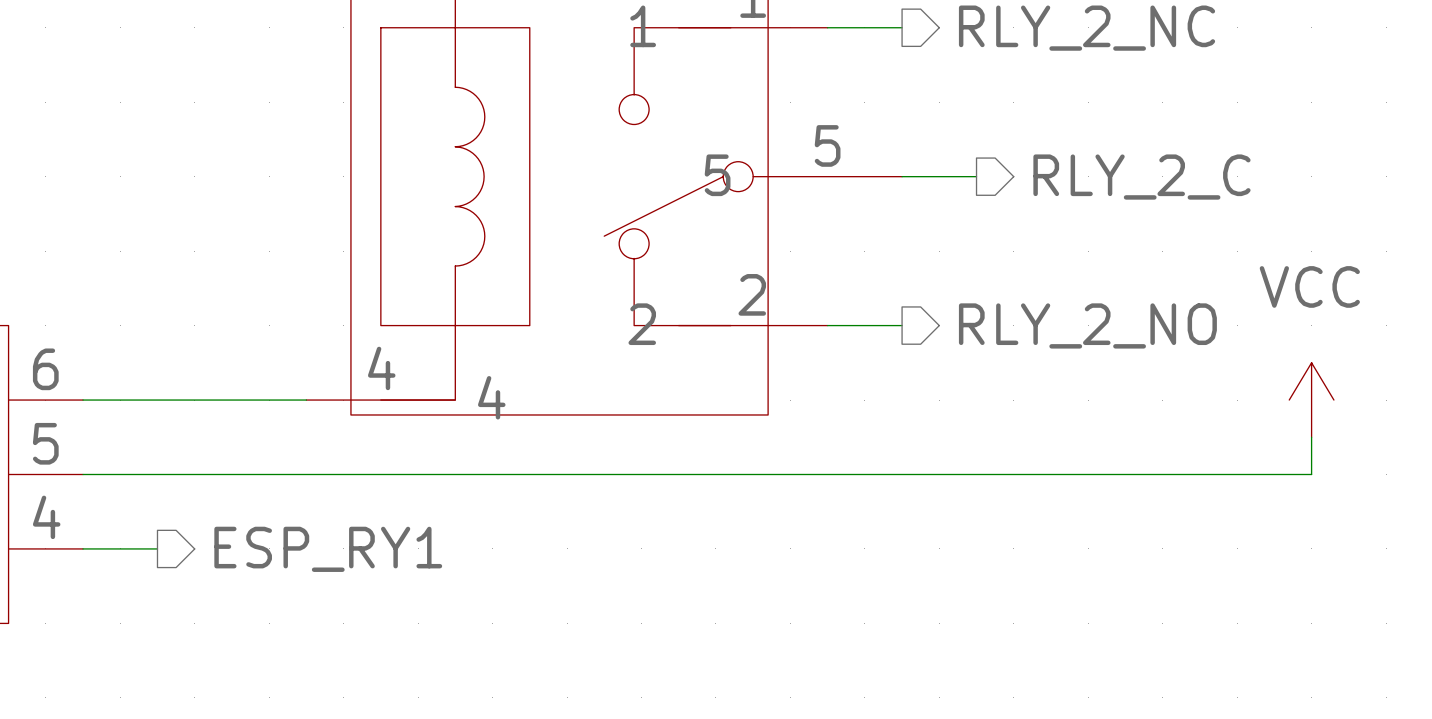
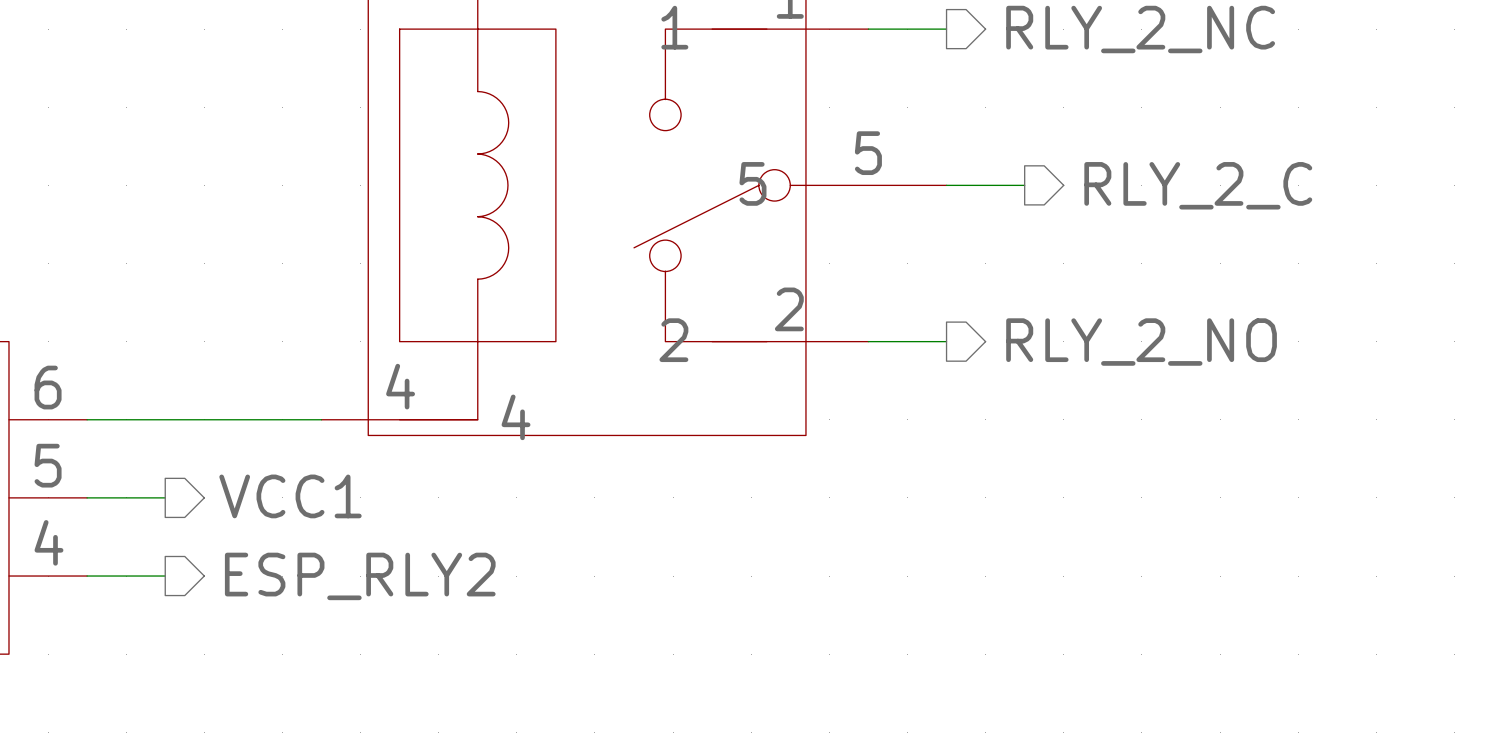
power symbol: VCC (1311, 400) -> none
wire: (1311, 437) (1311, 474) (157, 474) -> none
hierarchical label: none -> VCC1 (290, 496)
hierarchical label: ESP_RY1 (328, 549) -> ESP_RLY2 (360, 576)

